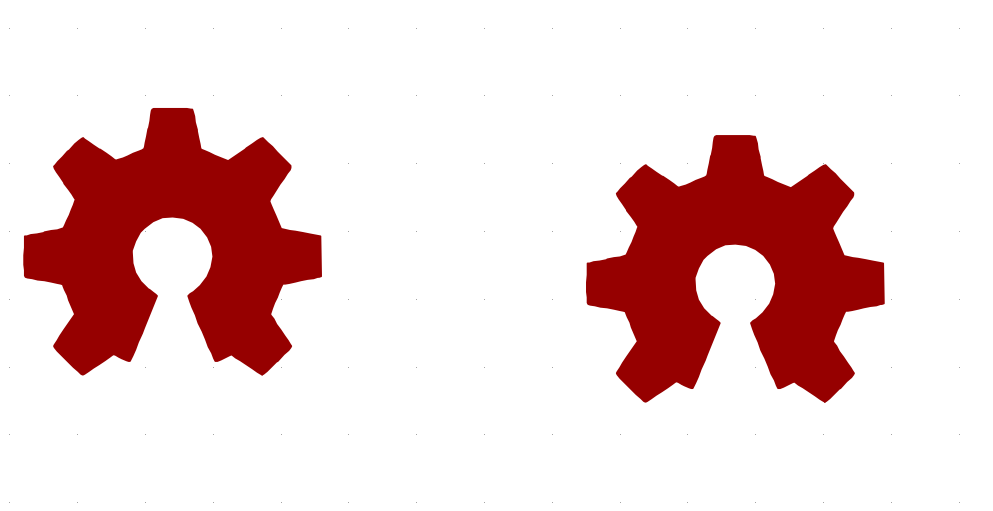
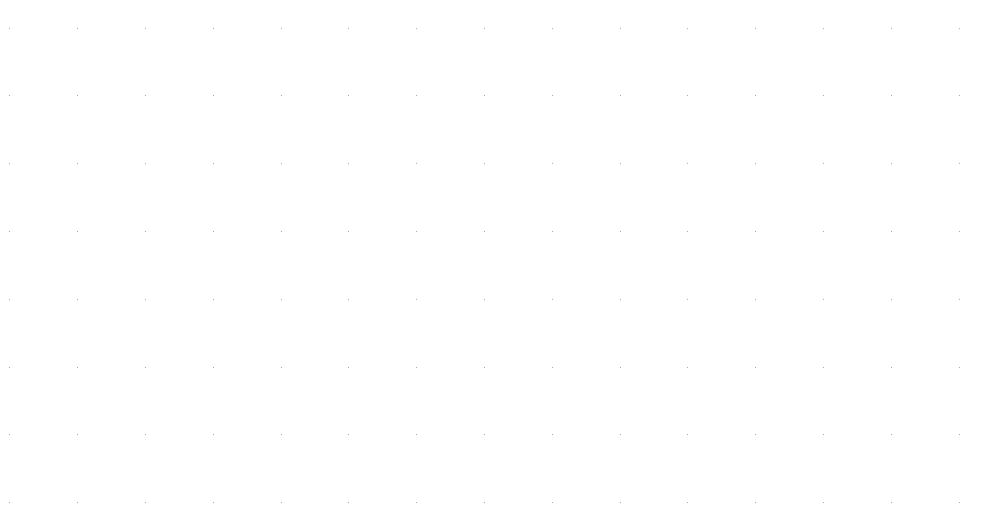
part: (172, 241) -> none
power symbol: (735, 268) -> none

